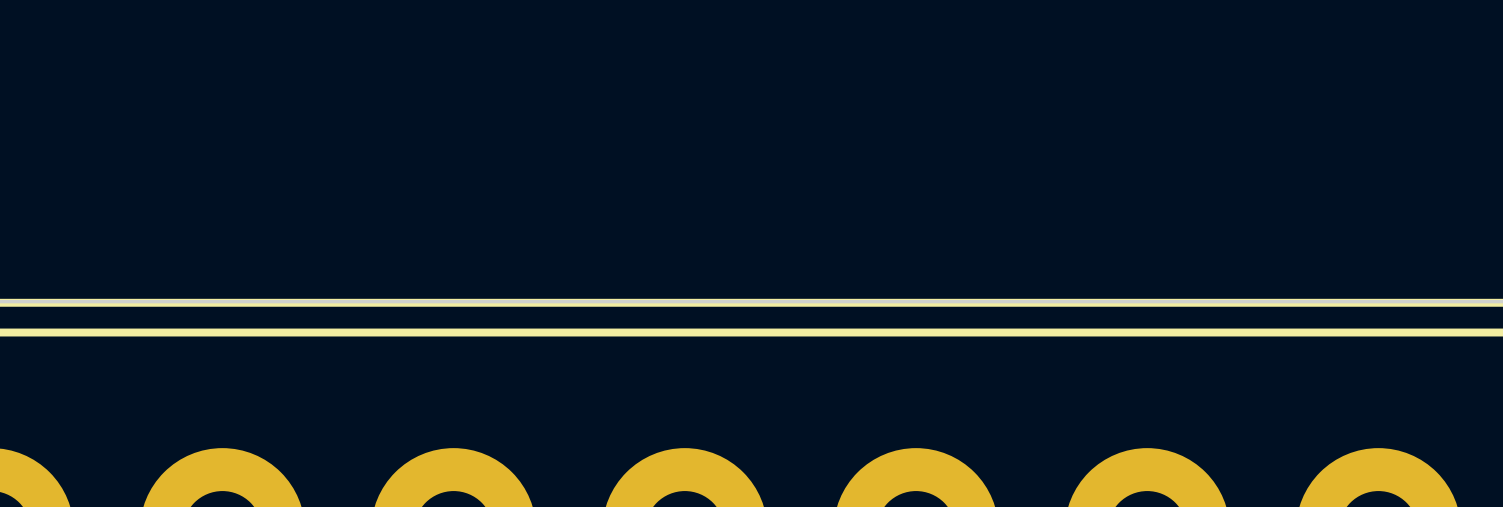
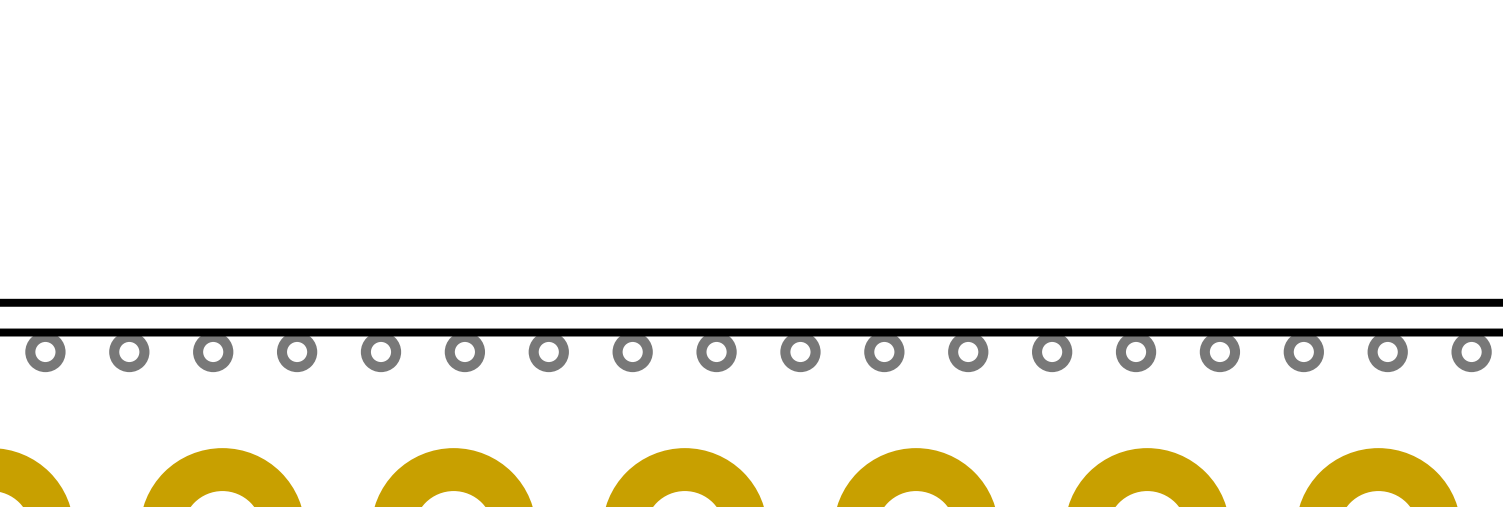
via: none -> (45, 351)
via: none -> (129, 351)
via: none -> (213, 351)
via: none -> (297, 351)
via: none -> (380, 351)
via: none -> (464, 351)
via: none -> (548, 351)
via: none -> (632, 351)
via: none -> (716, 351)
via: none -> (800, 351)
via: none -> (884, 351)
via: none -> (968, 351)
via: none -> (1052, 351)
via: none -> (1136, 351)
via: none -> (1219, 351)
via: none -> (1303, 351)
via: none -> (1387, 351)
via: none -> (1471, 351)

